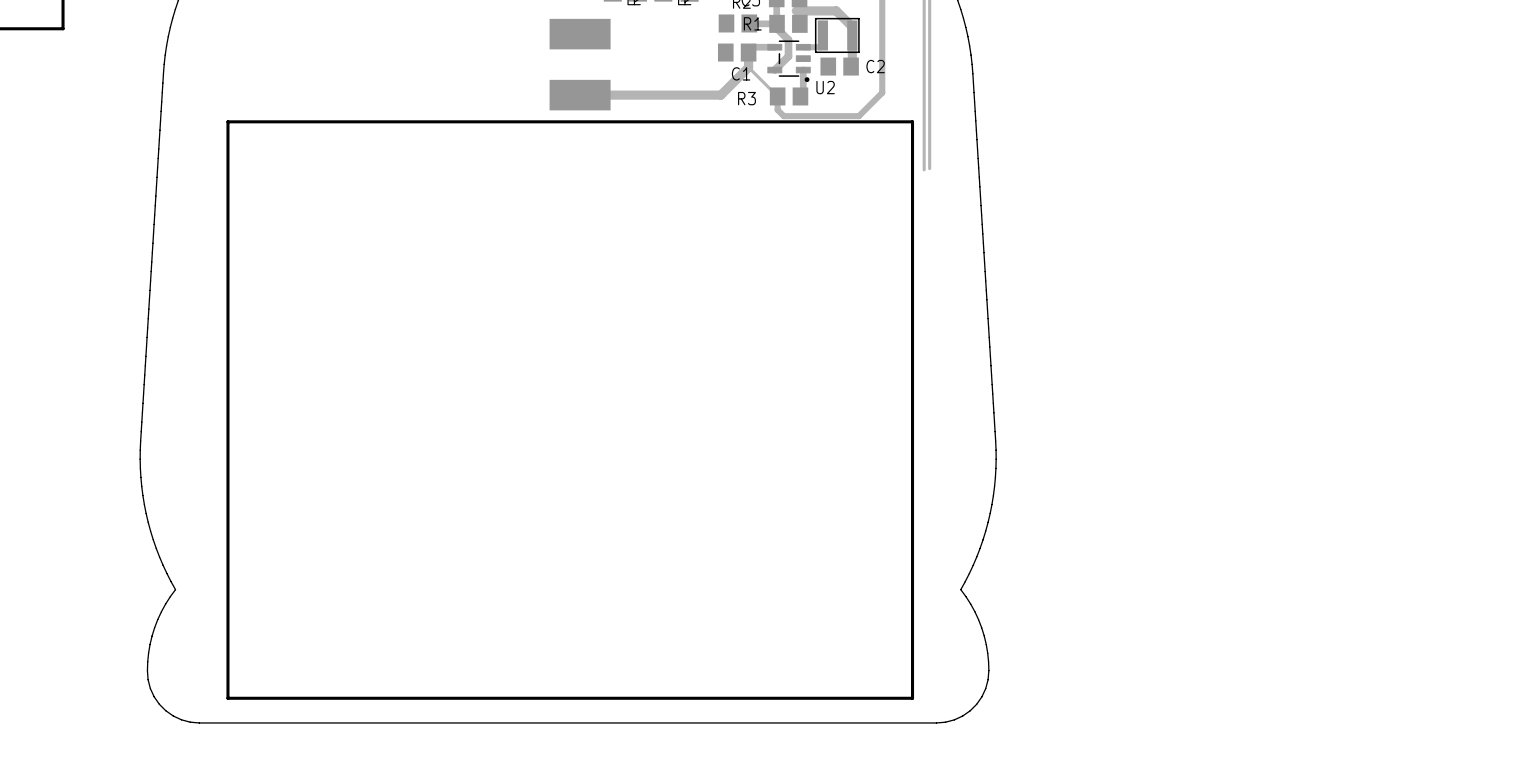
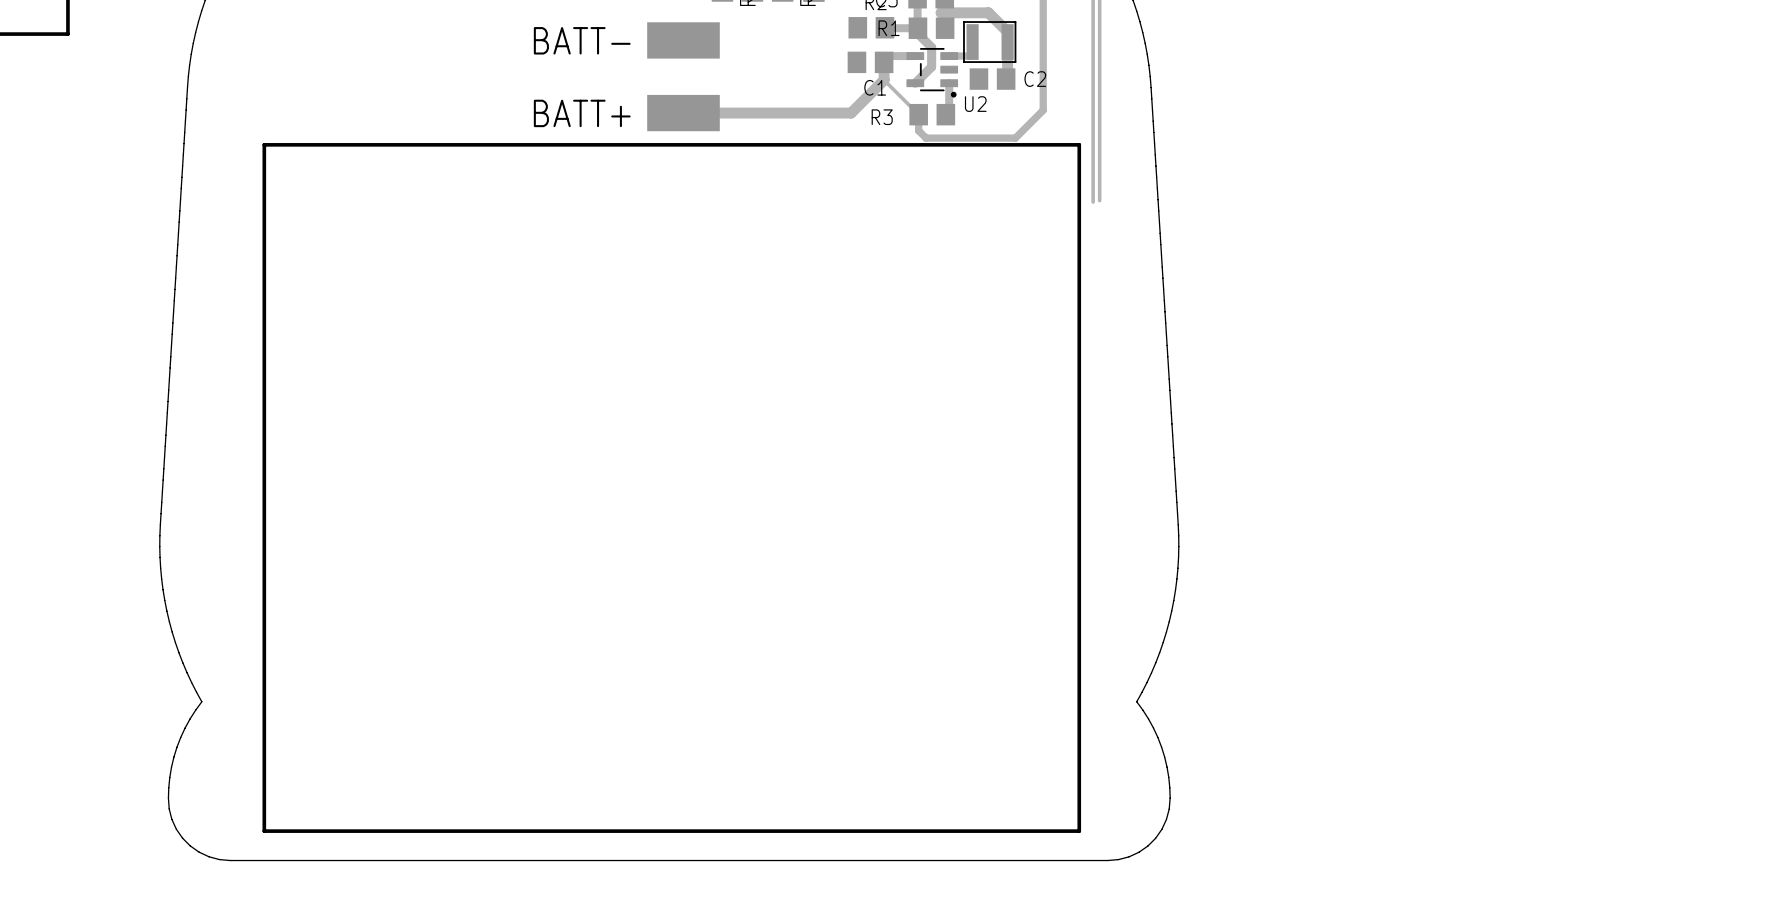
text: none -> BATT- (582, 40)
text: none -> BATT+ (582, 113)

